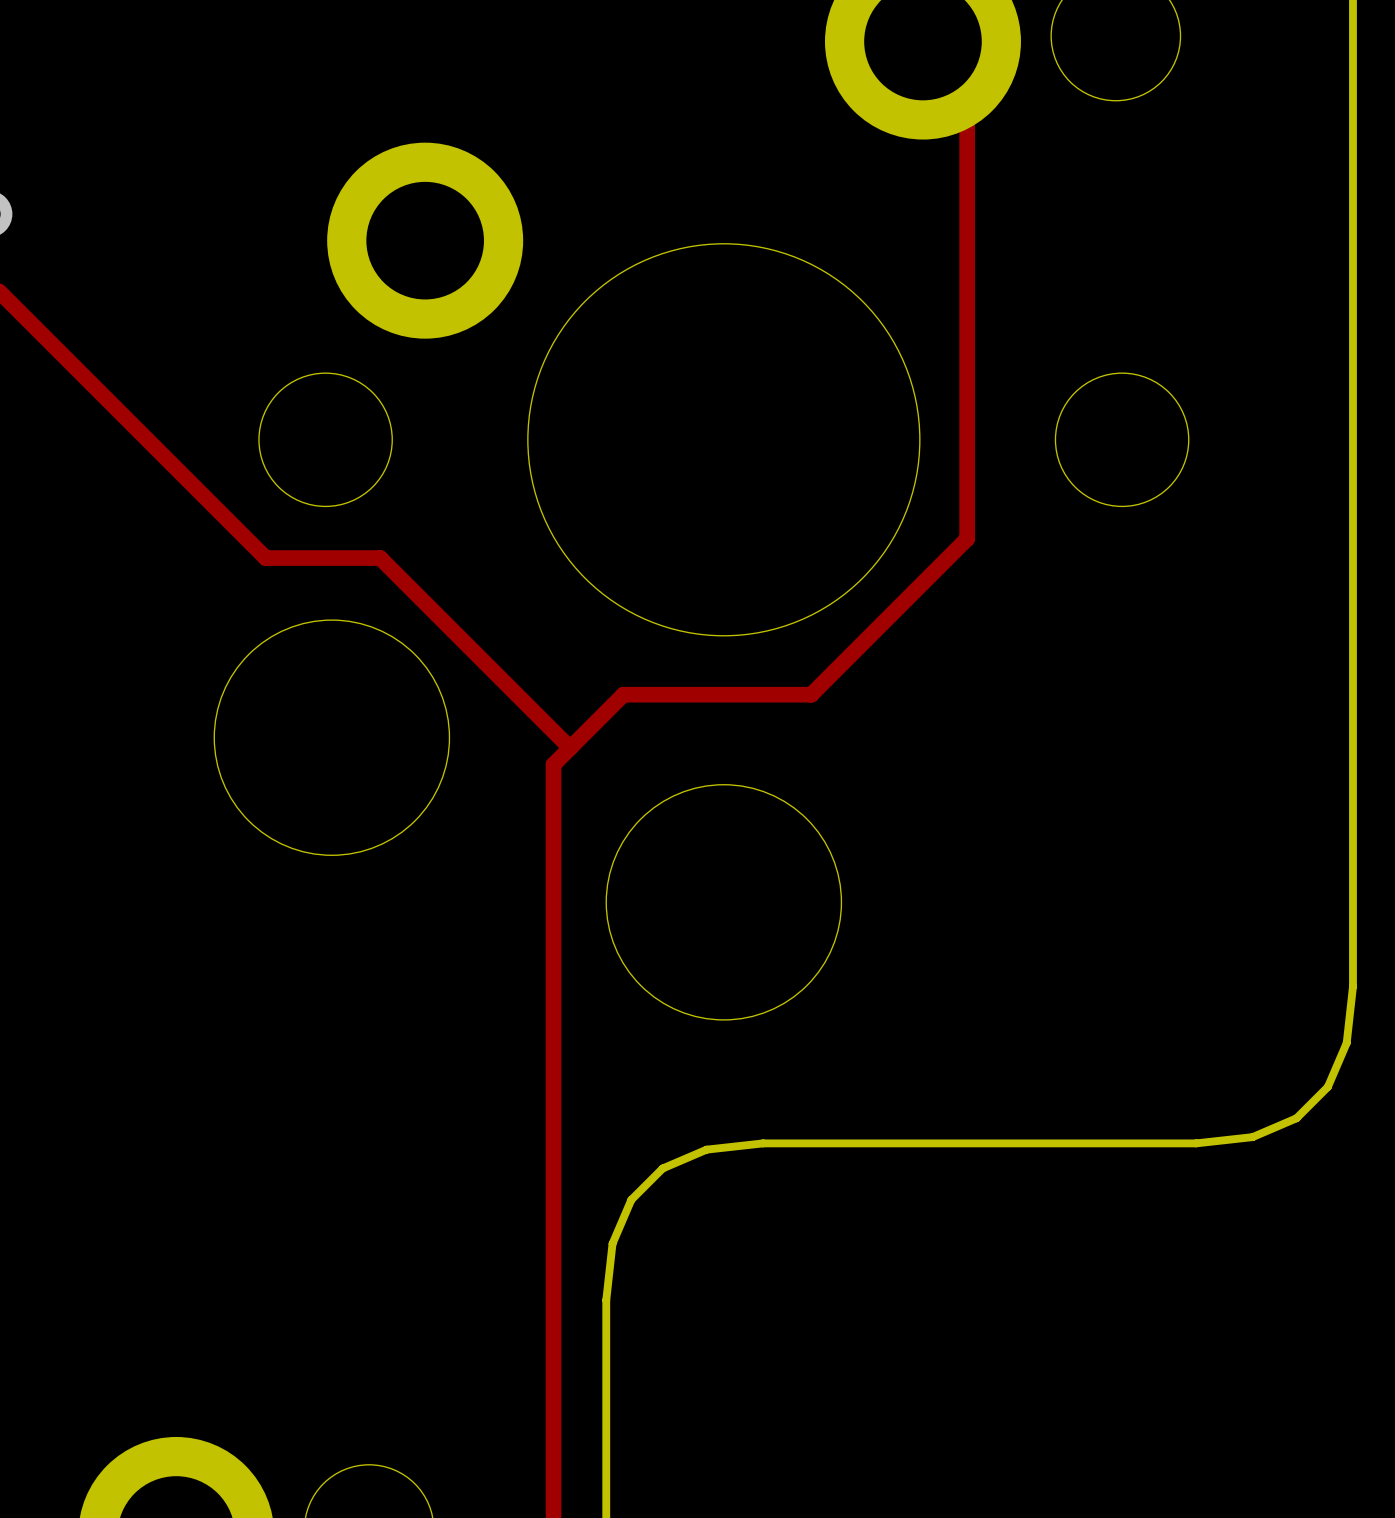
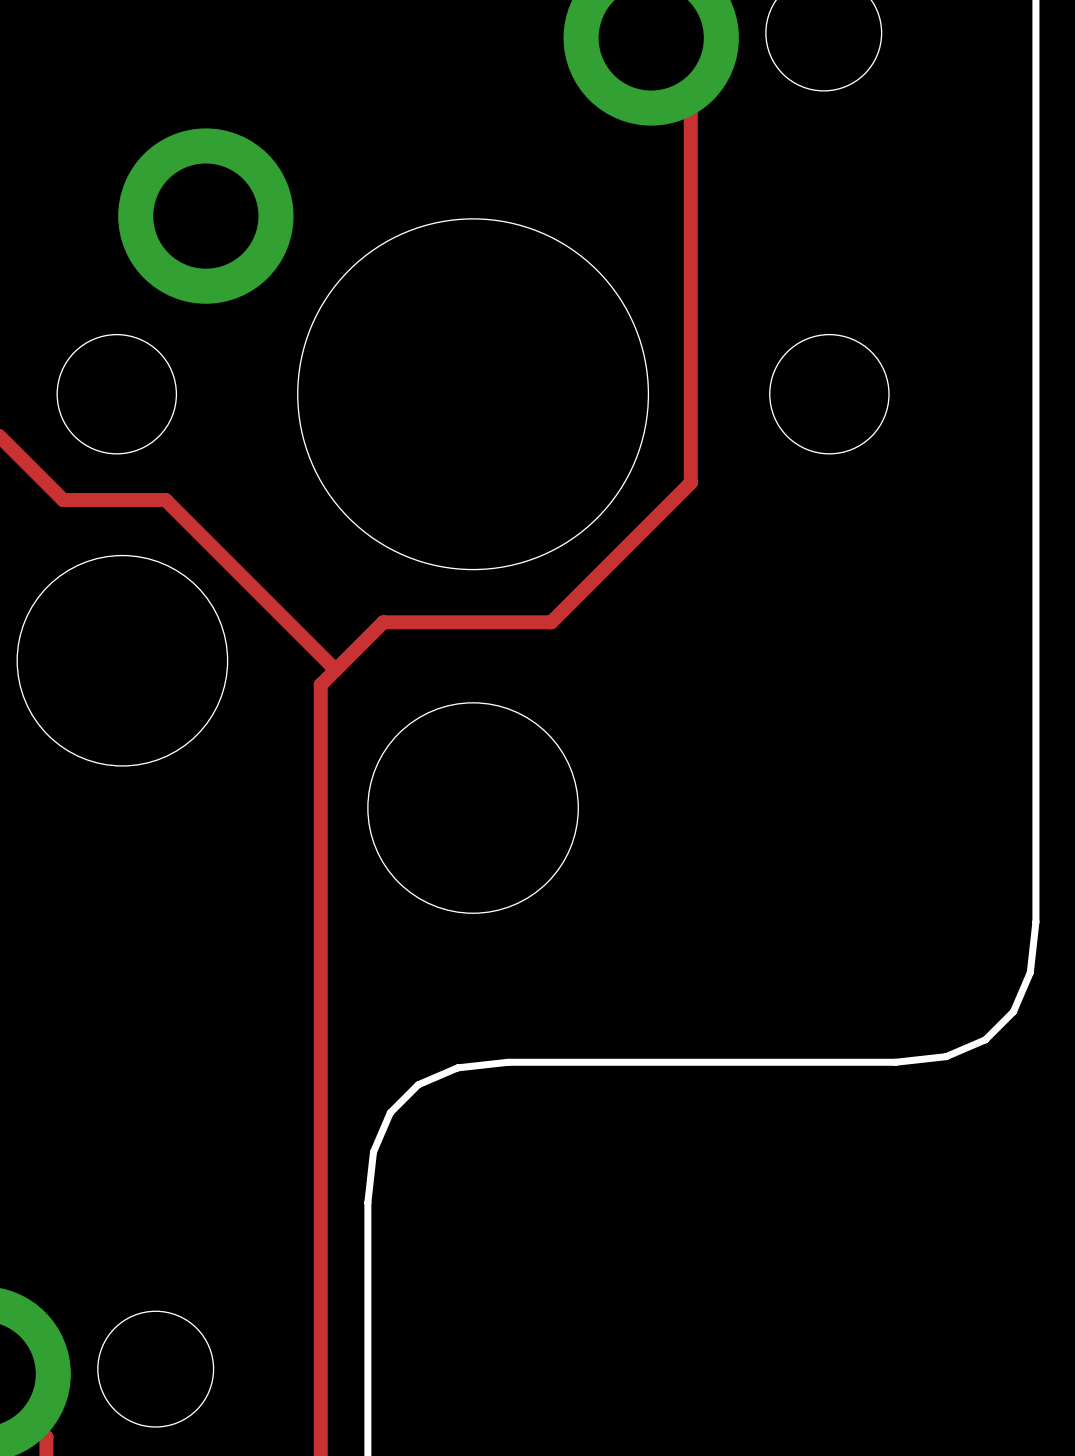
board edge: (1352, 986) (1346, 1043) (1327, 1086) (1296, 1118) (1252, 1137) (1196, 1143) (763, 1143) (706, 1149) (662, 1168) (631, 1199) (612, 1243) (606, 1300) (606, 1343) -> (1035, 883) (1035, 922) (1030, 972) (1013, 1011) (985, 1039) (946, 1056) (895, 1062) (508, 1062) (457, 1067) (418, 1084) (390, 1112) (373, 1152) (367, 1202)

